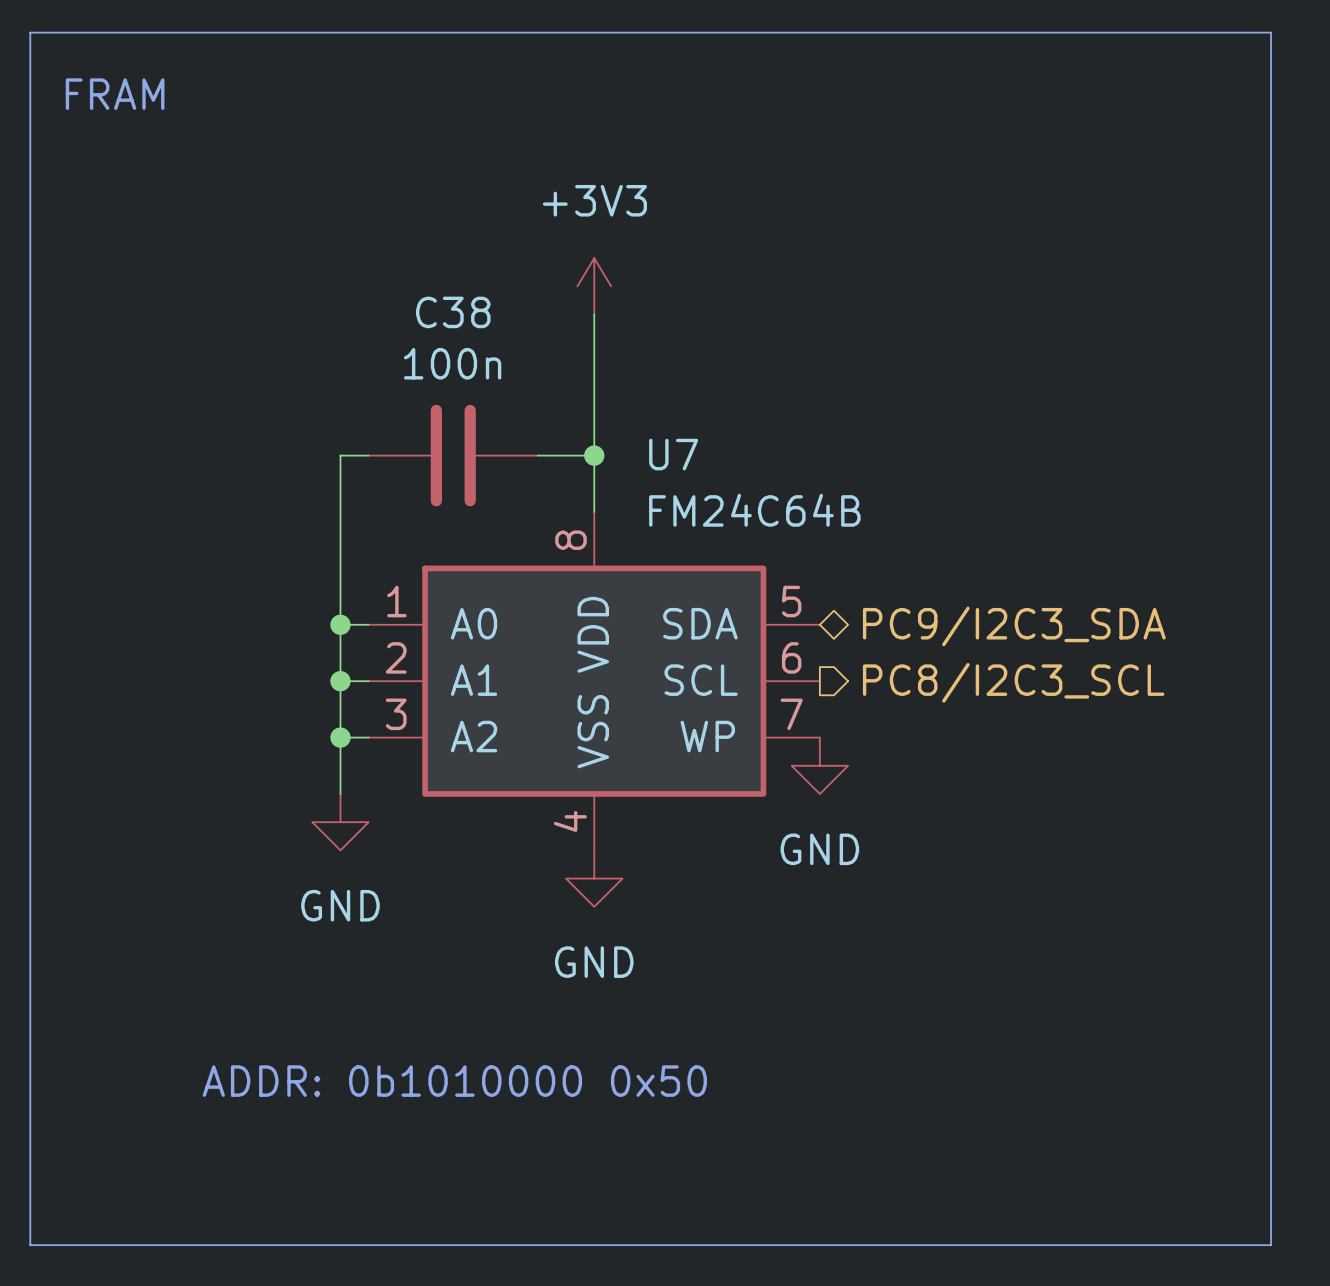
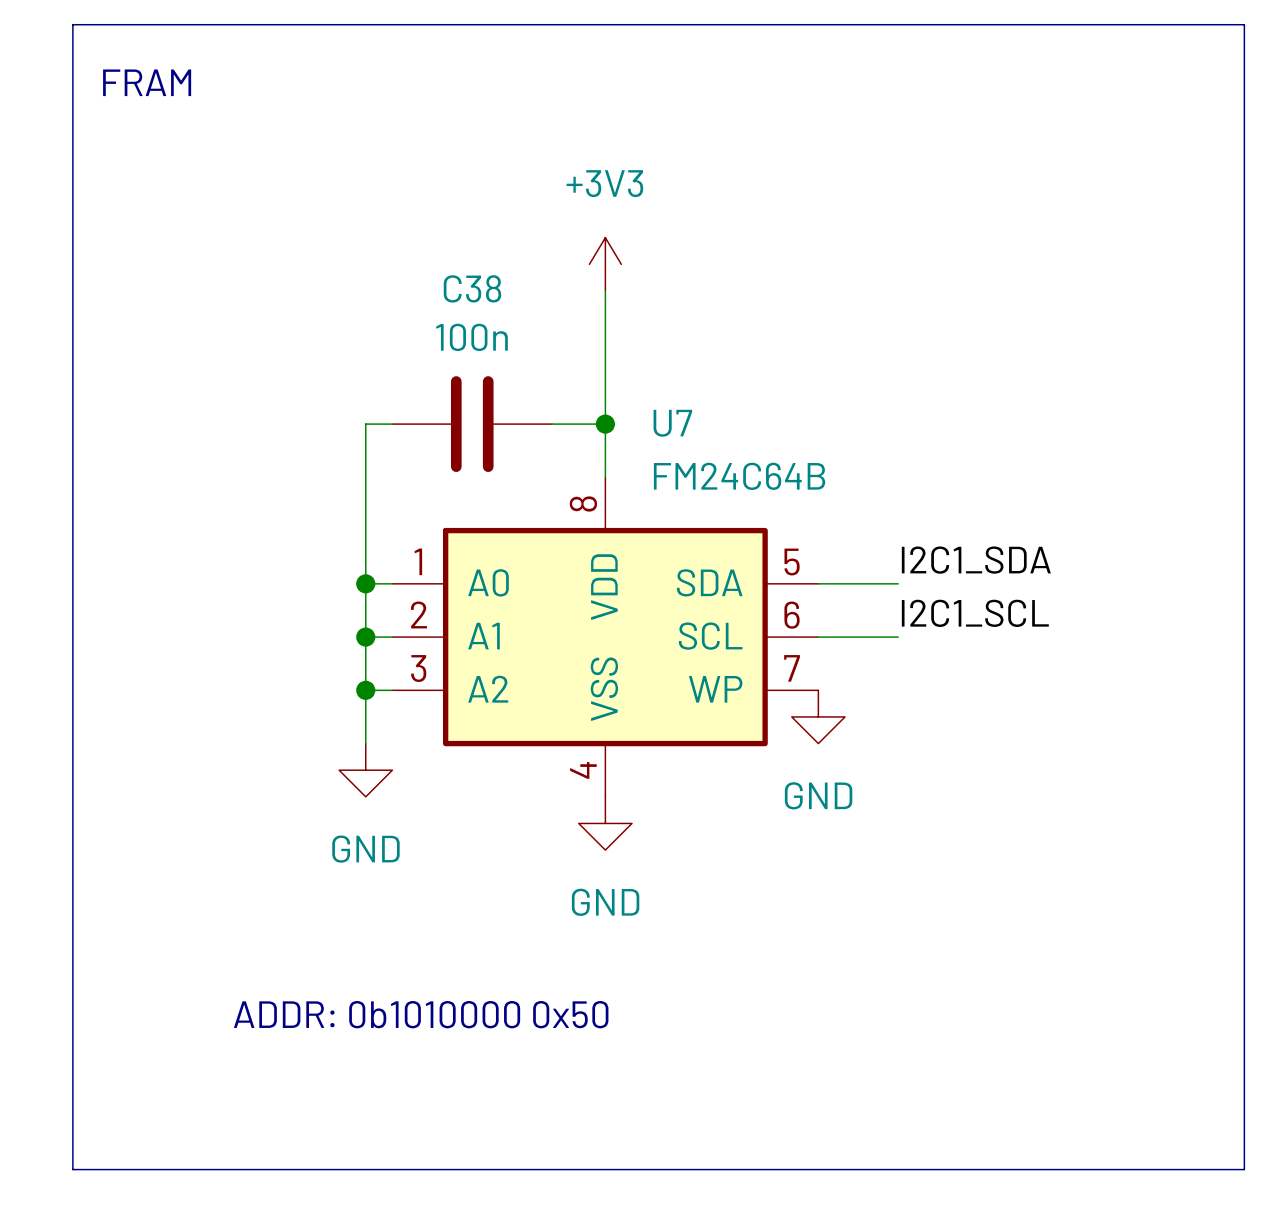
label: none -> I2C1_SDA (976, 560)
wire: none -> (818, 583) (898, 583)
hierarchical label: PC9/I2C3_SDA (1014, 626) -> none
label: none -> I2C1_SCL (975, 613)
wire: none -> (818, 637) (898, 637)
hierarchical label: PC8/I2C3_SCL (1013, 682) -> none

